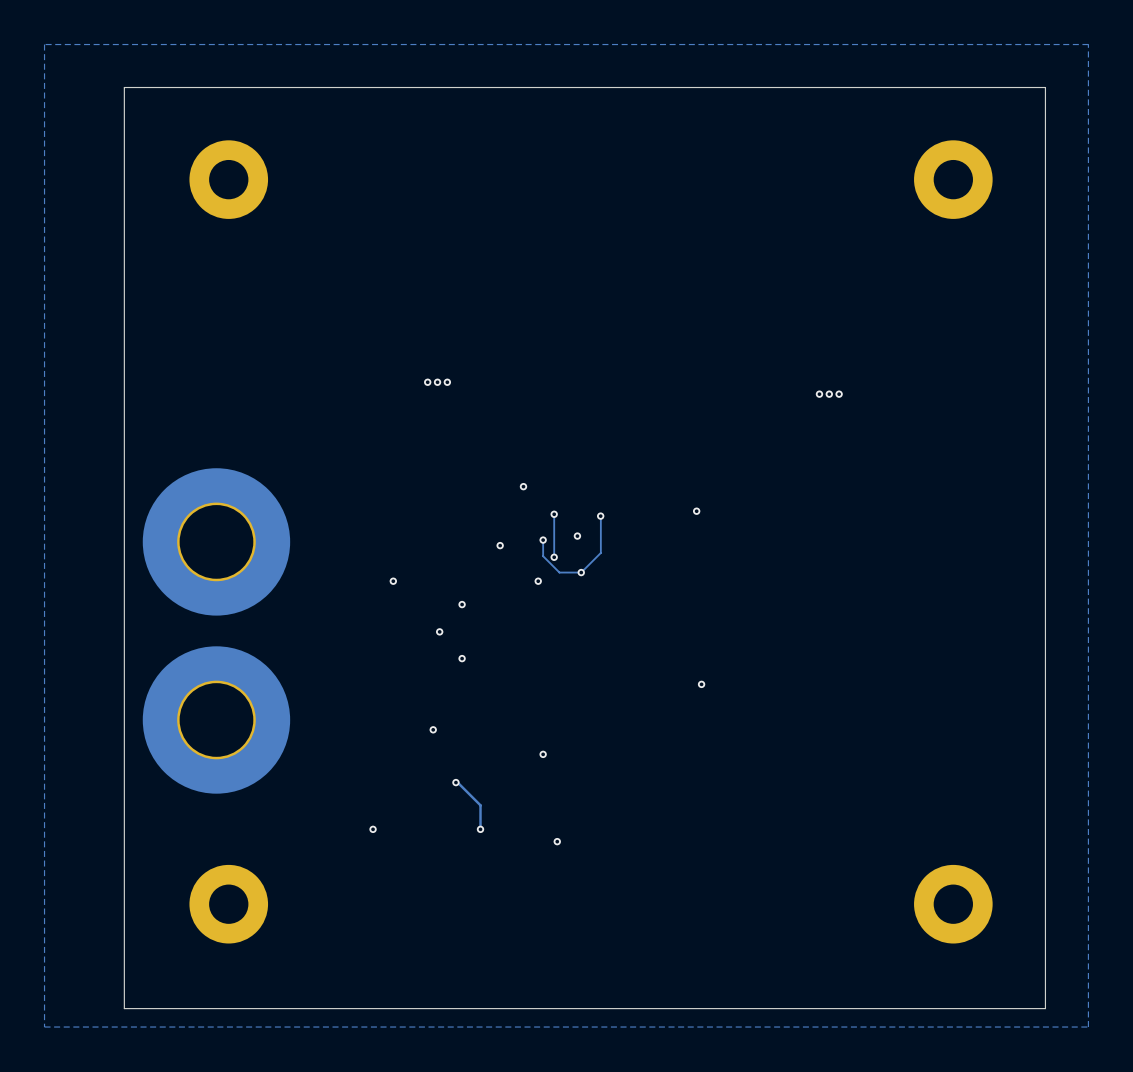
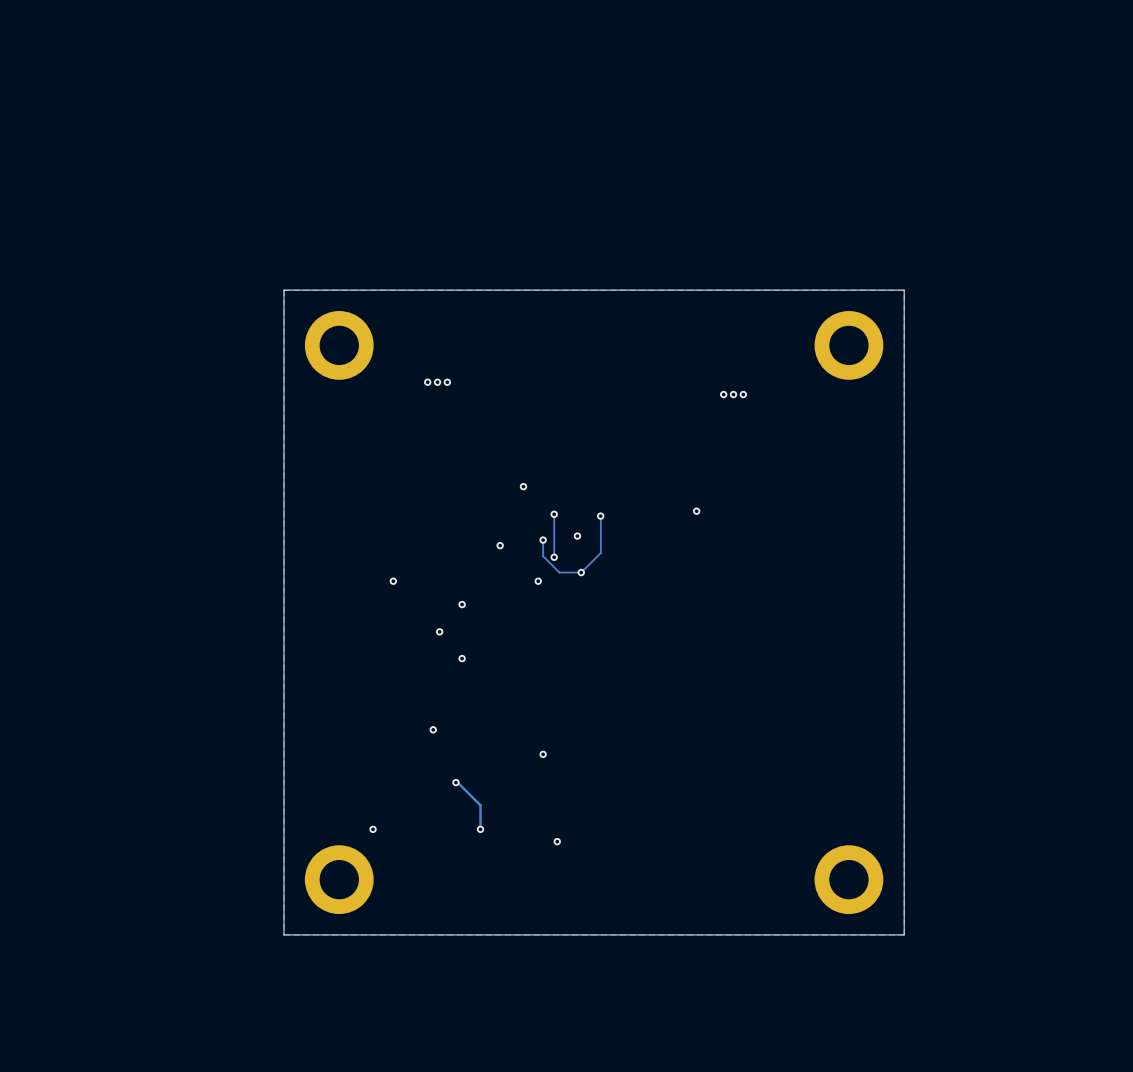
zone outline: (1088, 44) (44, 44) (44, 1027) (1088, 1027) (1088, 44) -> none
board edge: (1045, 87) (124, 87) (124, 1008) (1045, 1008) (1045, 87) -> none
part: (228, 179) -> none
part: (953, 179) -> none
board edge: none -> (904, 290) (284, 290) (284, 934) (904, 934) (904, 290)
part: none -> (339, 345)
part: none -> (848, 345)
via: none -> (723, 394)
via: none -> (733, 394)
via: none -> (743, 394)
via: (819, 394) -> none
via: (829, 394) -> none
via: (839, 394) -> none
part: (216, 541) -> none
via: (701, 684) -> none
part: (216, 719) -> none
part: none -> (339, 879)
part: none -> (848, 879)
part: (228, 904) -> none
part: (953, 904) -> none

